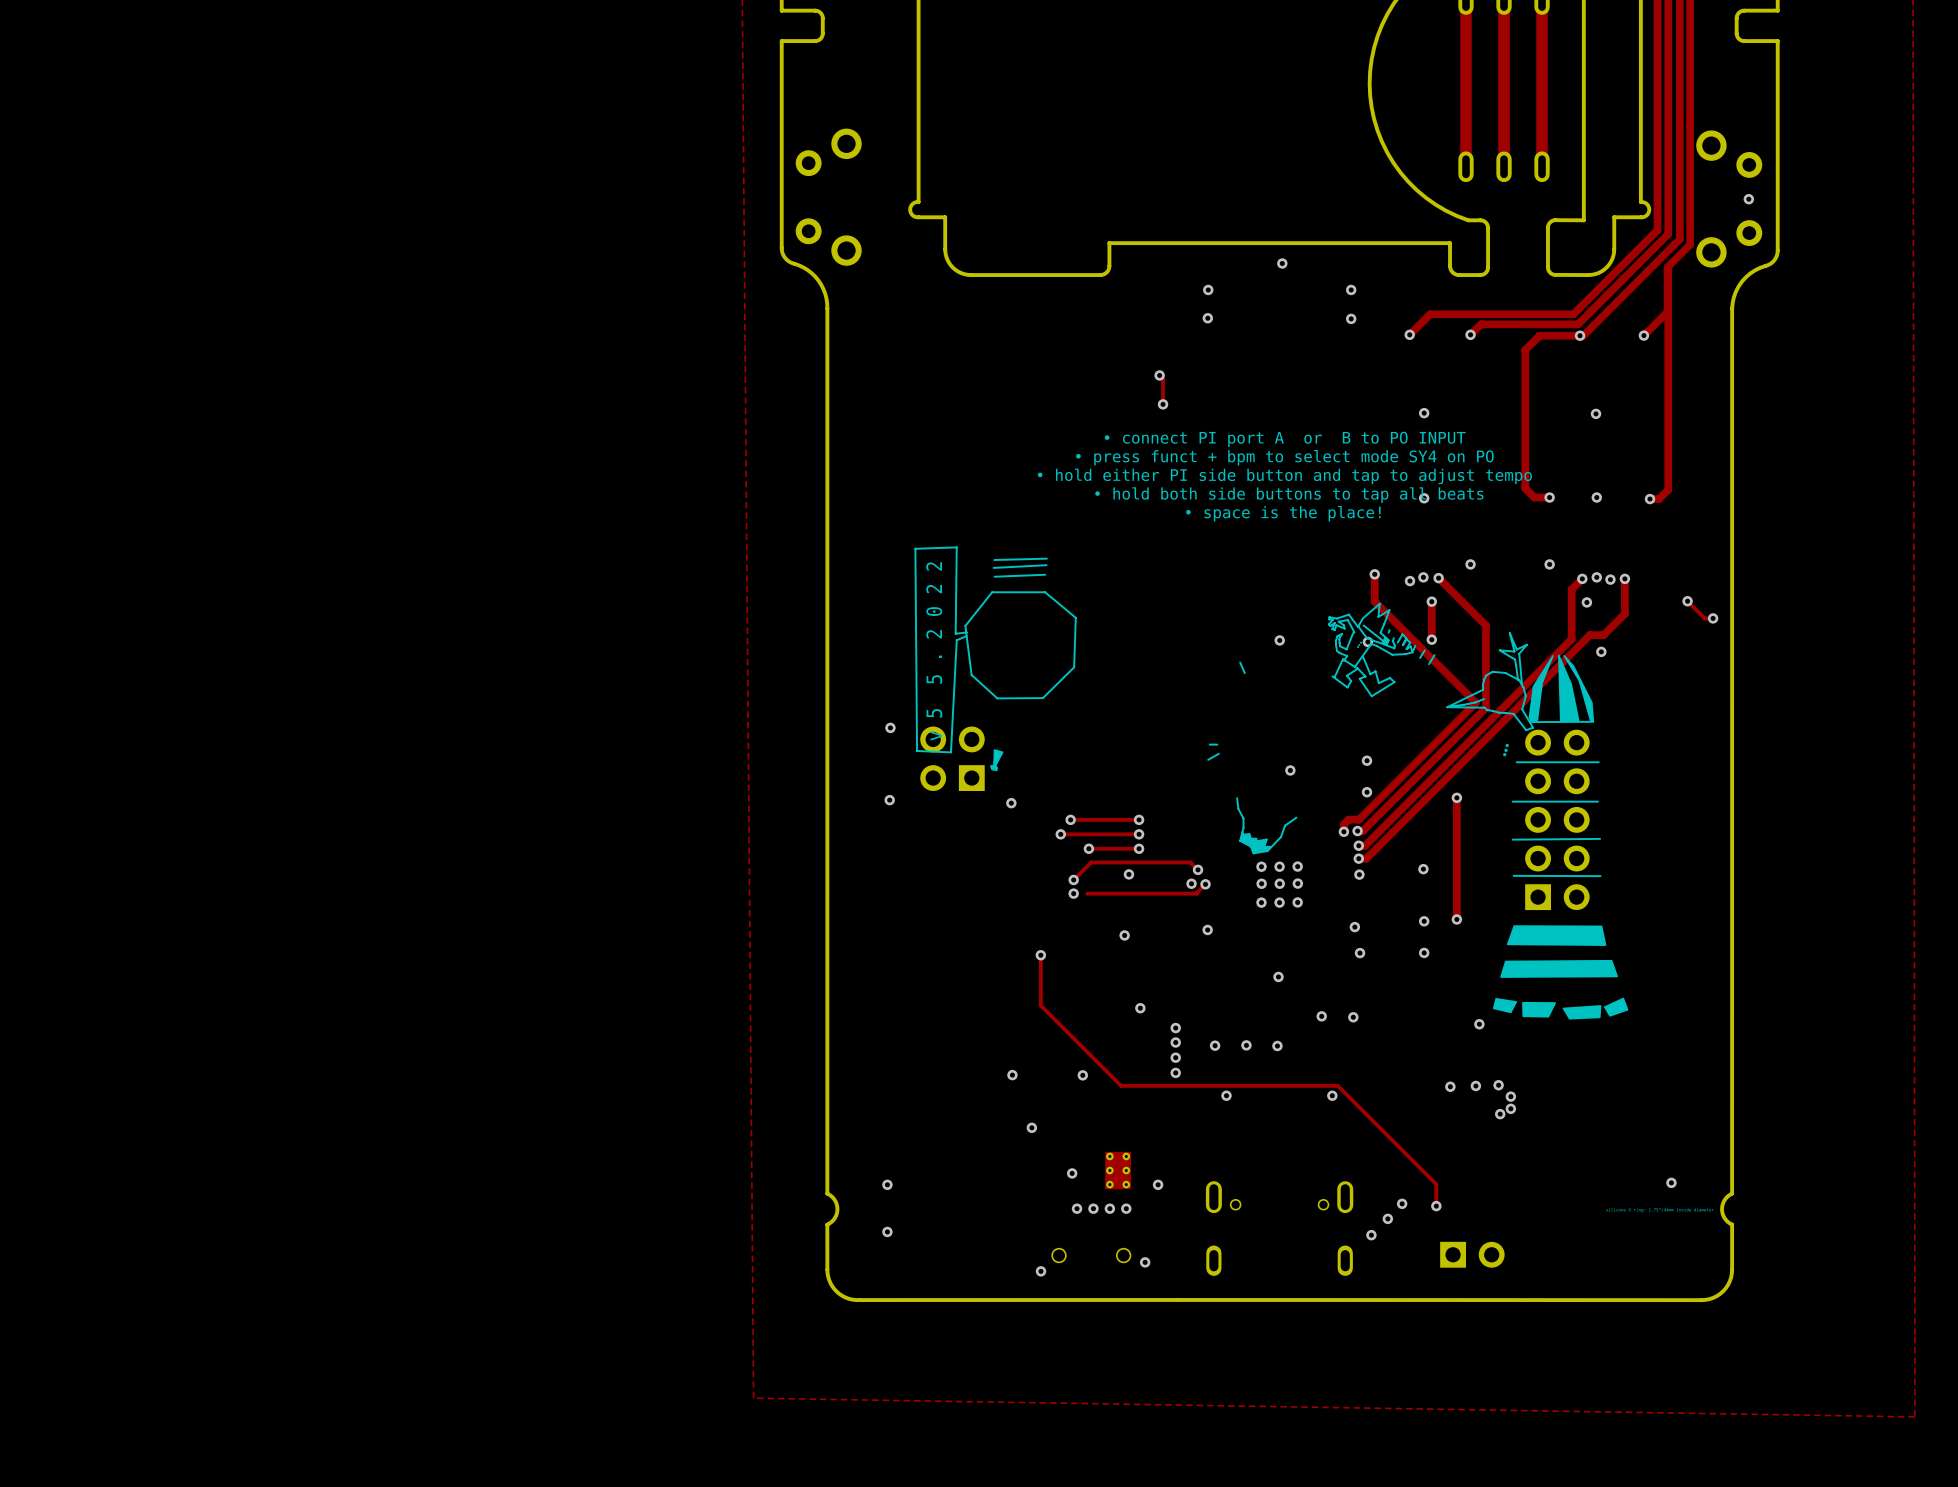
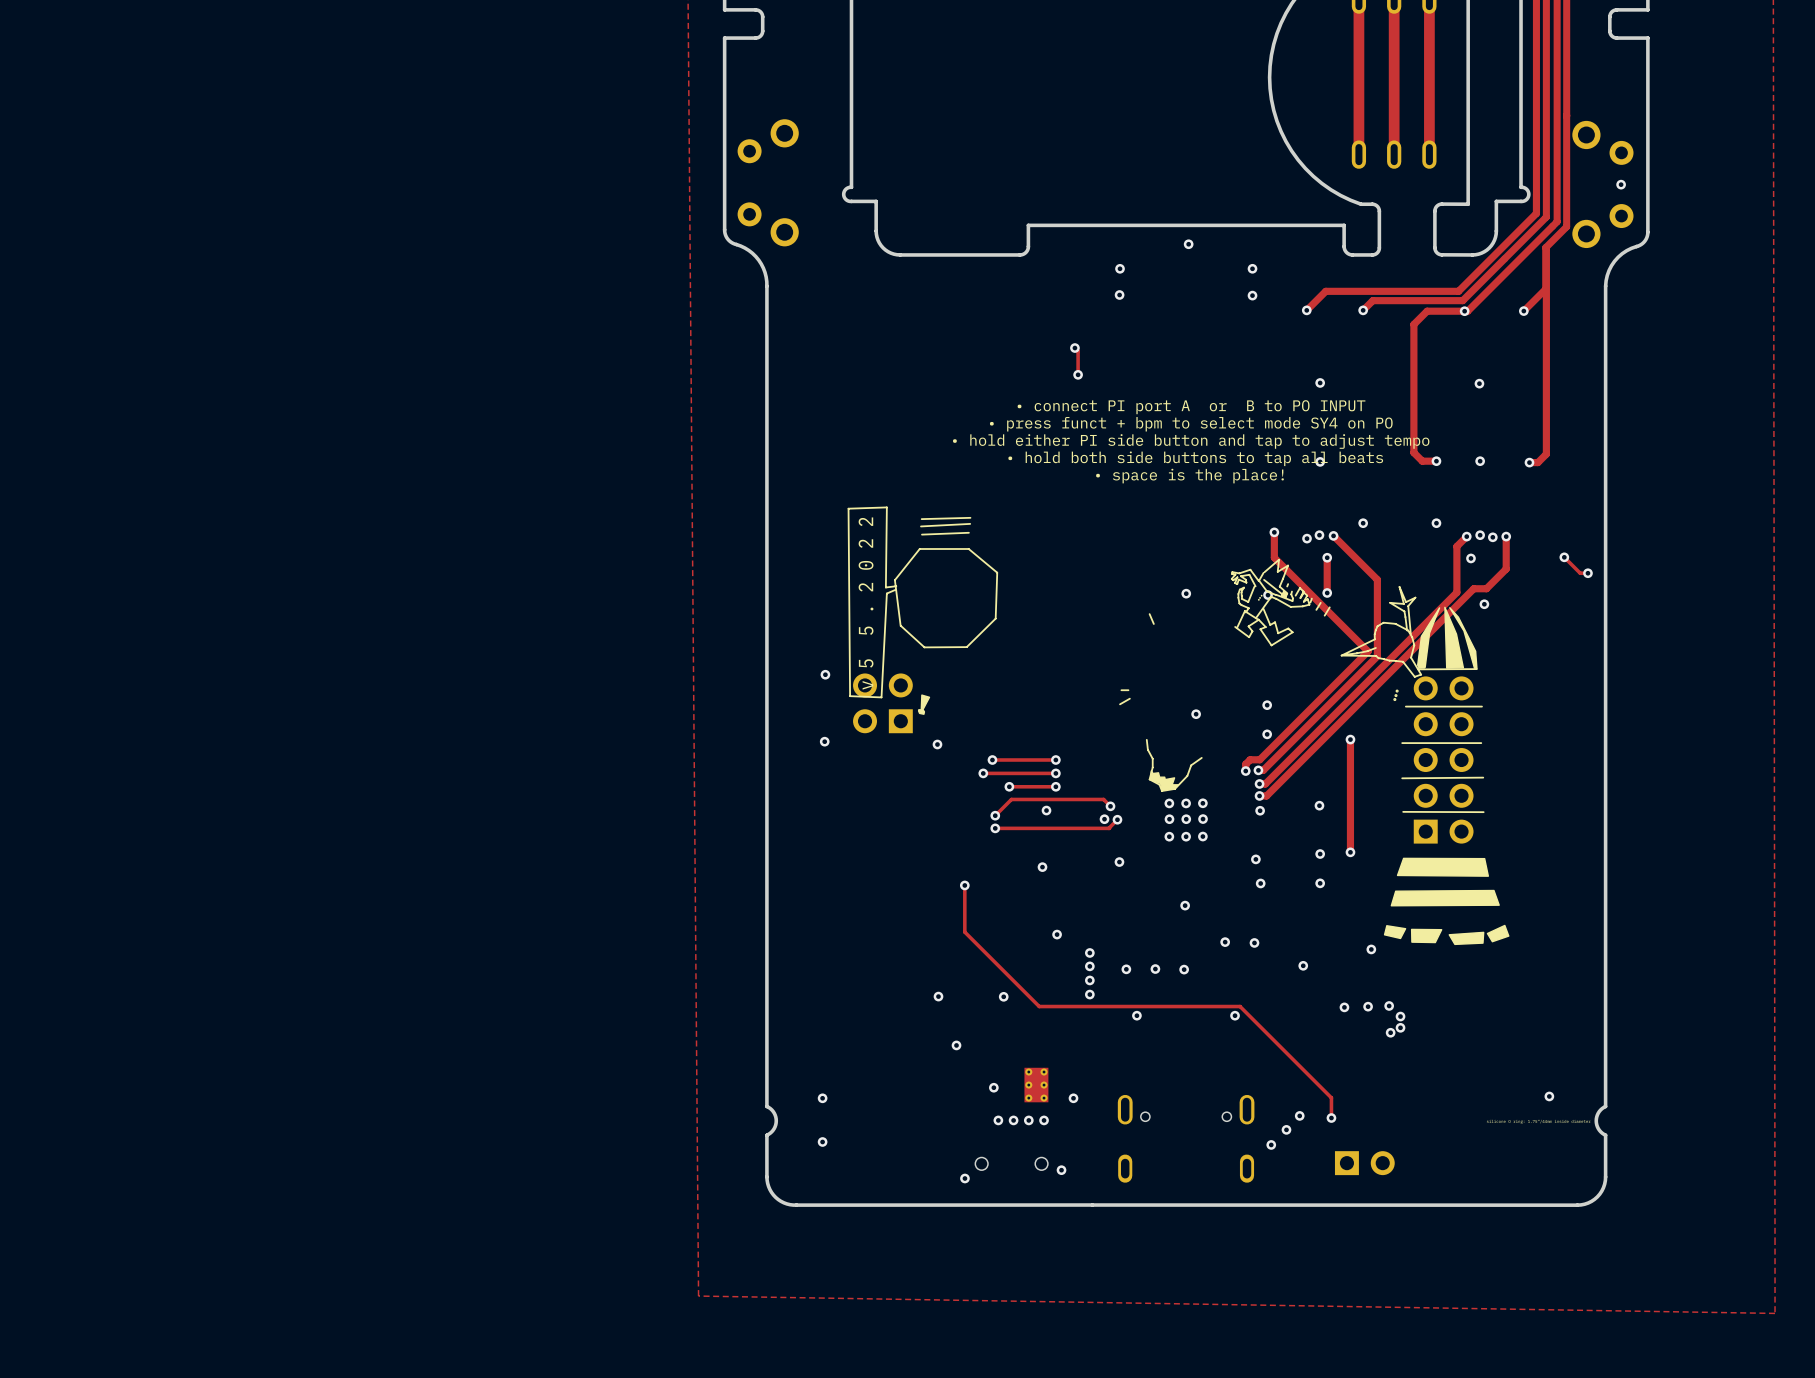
track: none -> (995, 828) (1007, 828)
via: none -> (1303, 965)

